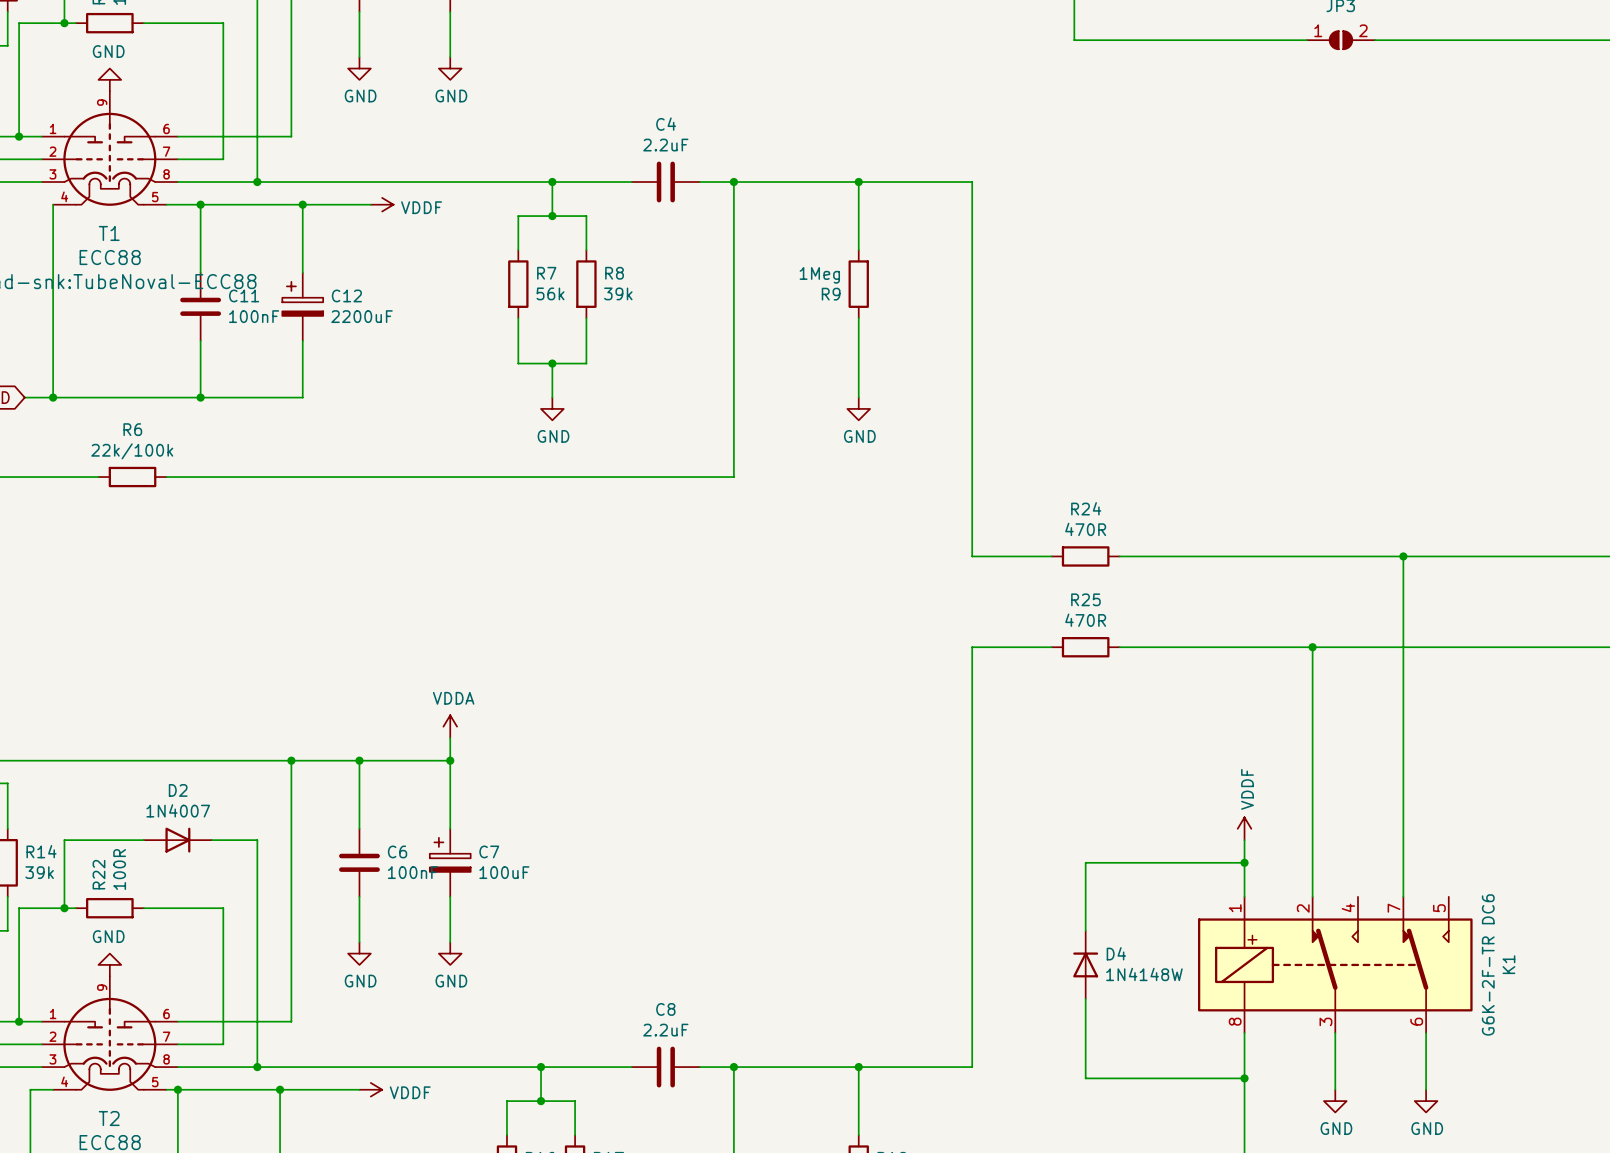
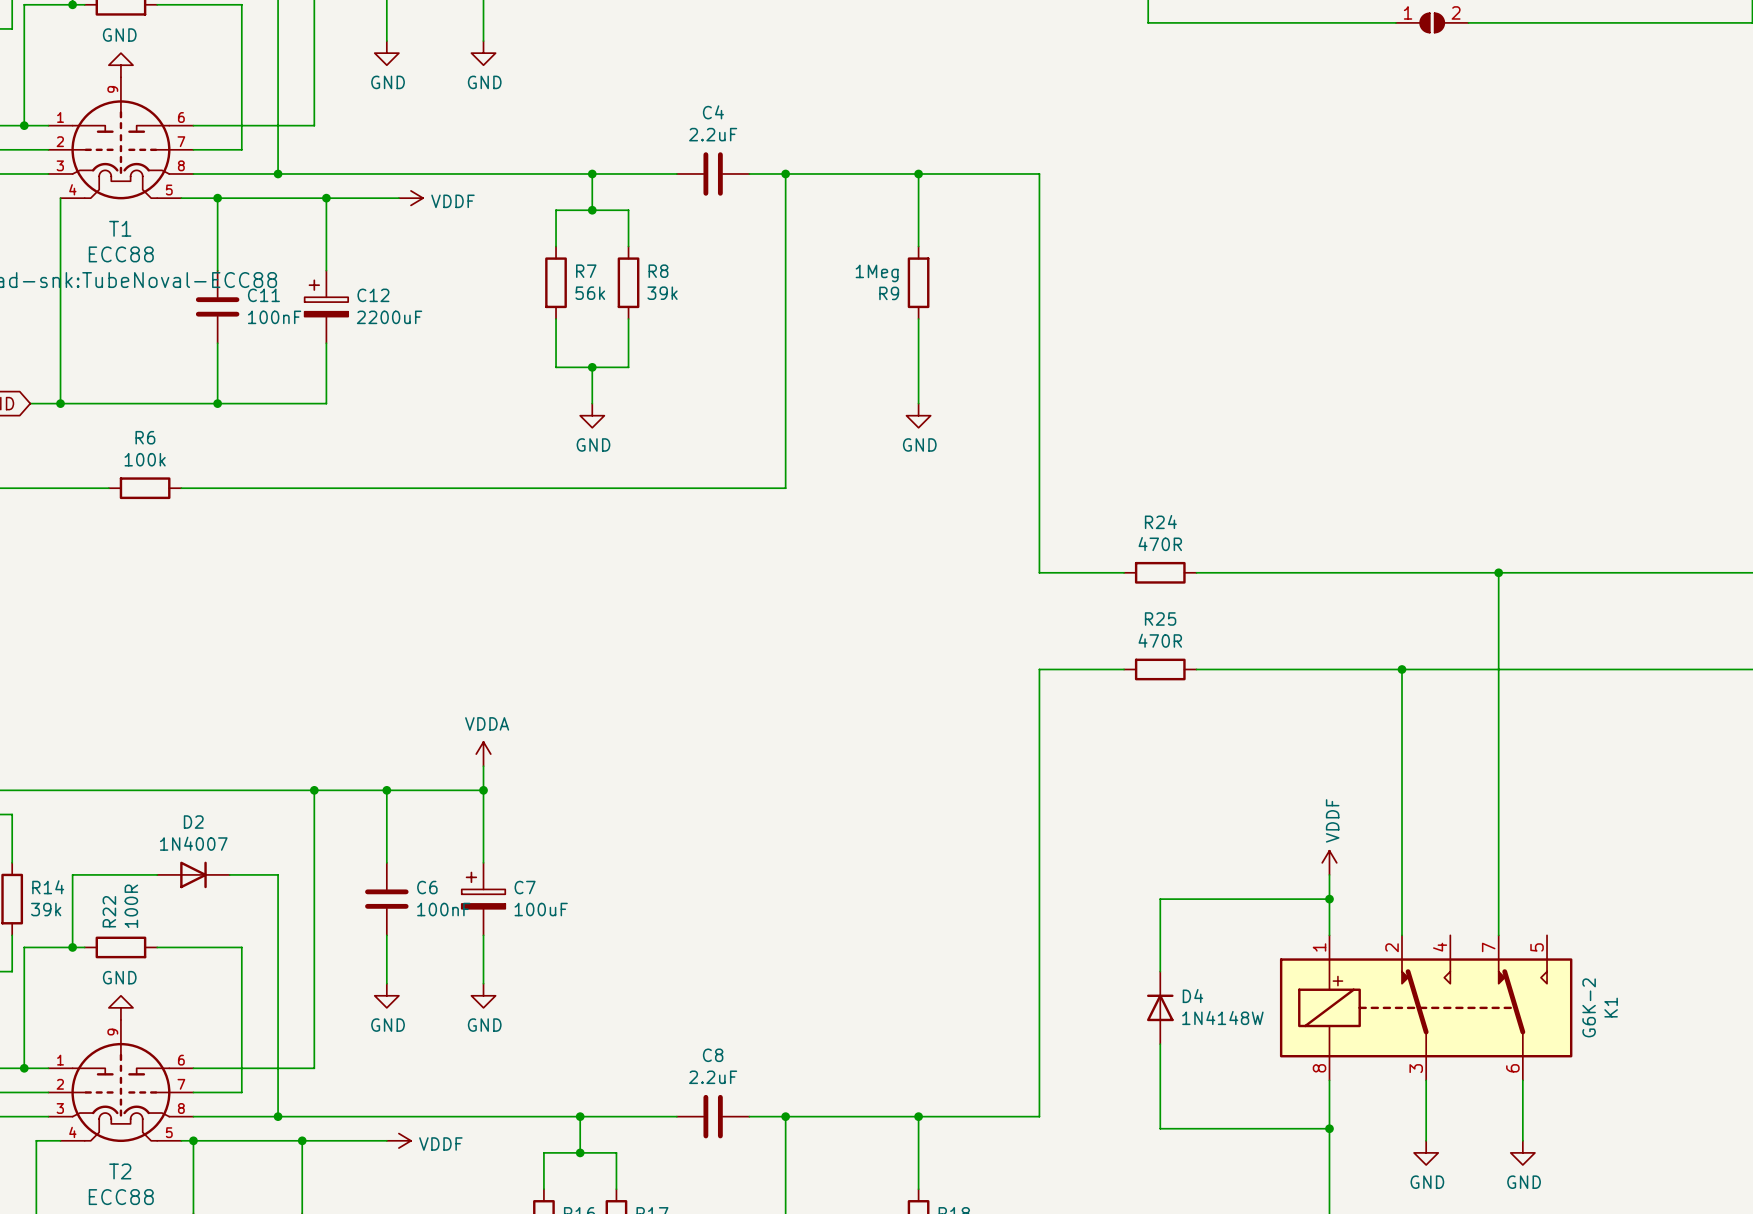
R6 value: 22k/100k (132, 451) -> 100k (145, 459)
K1 value: G6K-2F-TR DC6 (1488, 964) -> G6K-2 (1589, 1007)

